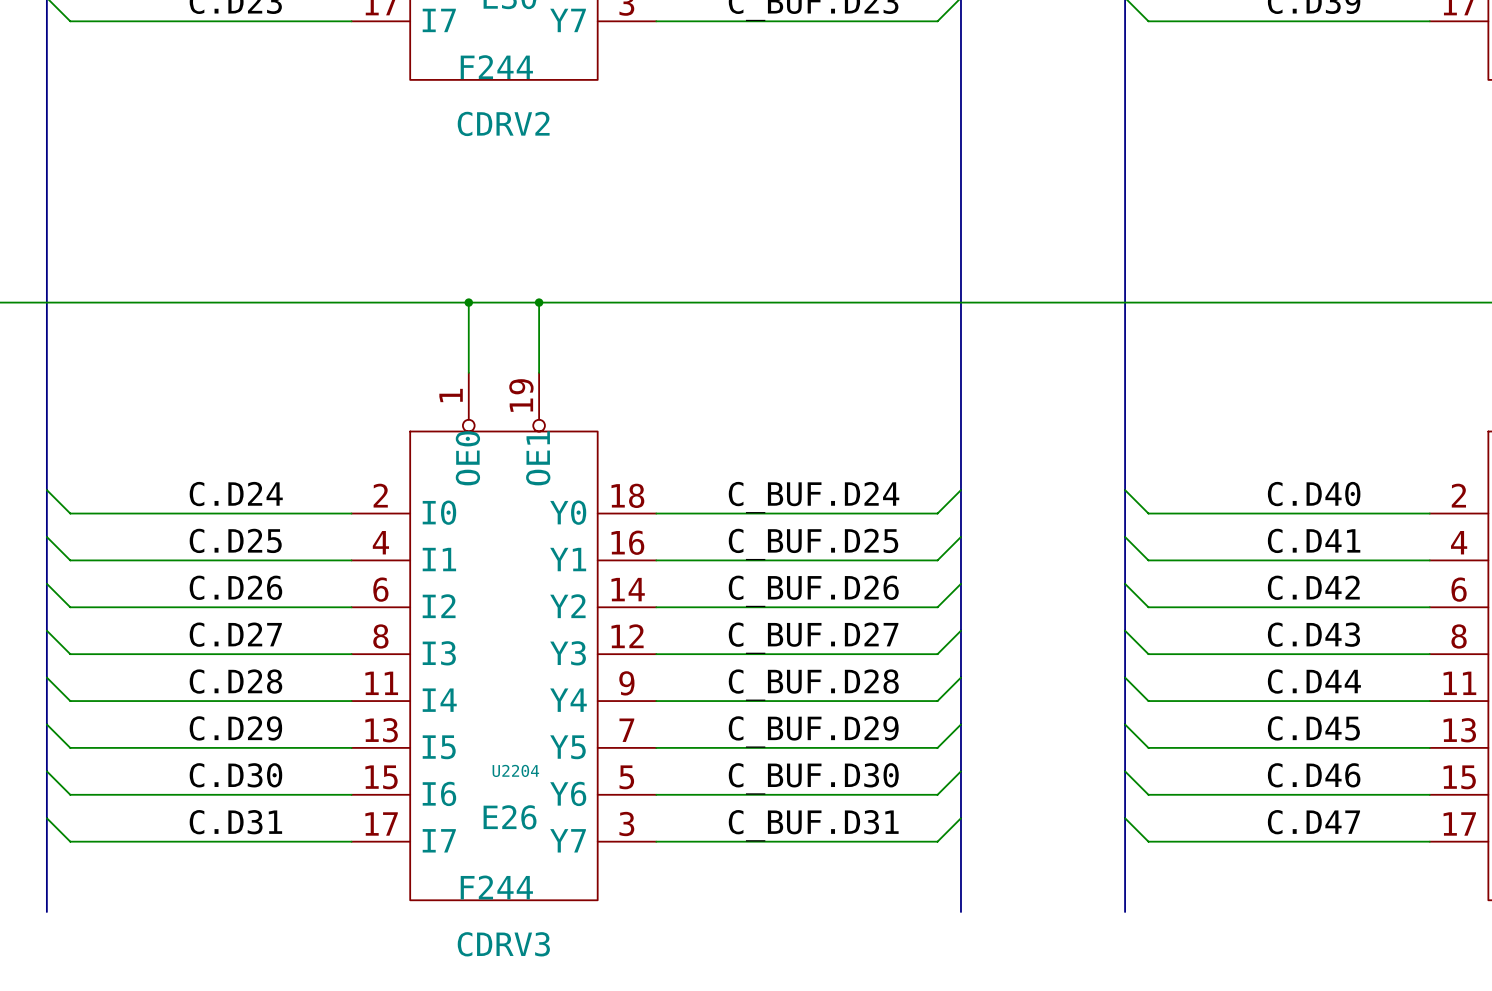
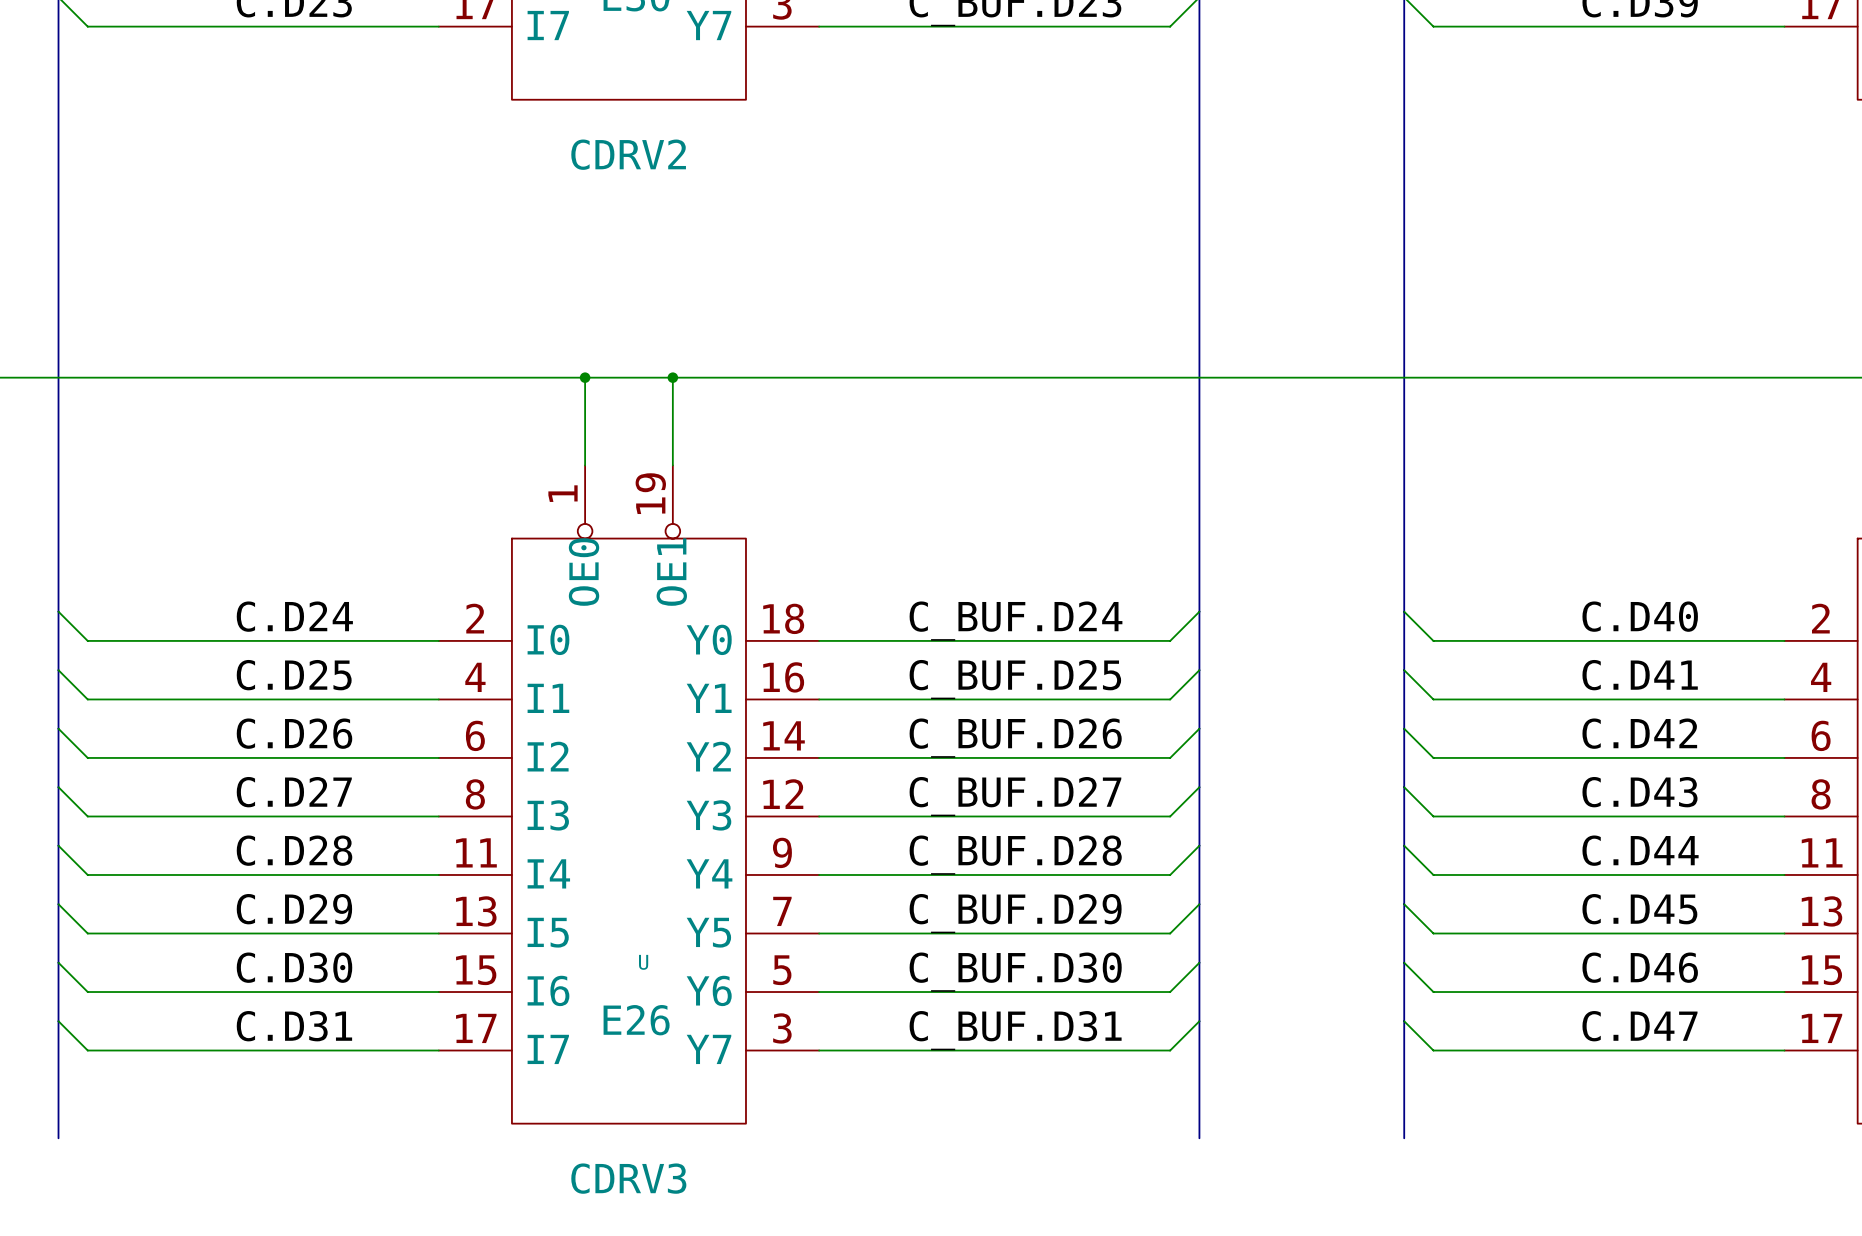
part value: F244 (496, 67) -> none
U2204 name: U2204 (515, 770) -> U (643, 962)
U2204 value: F244 (496, 887) -> none

